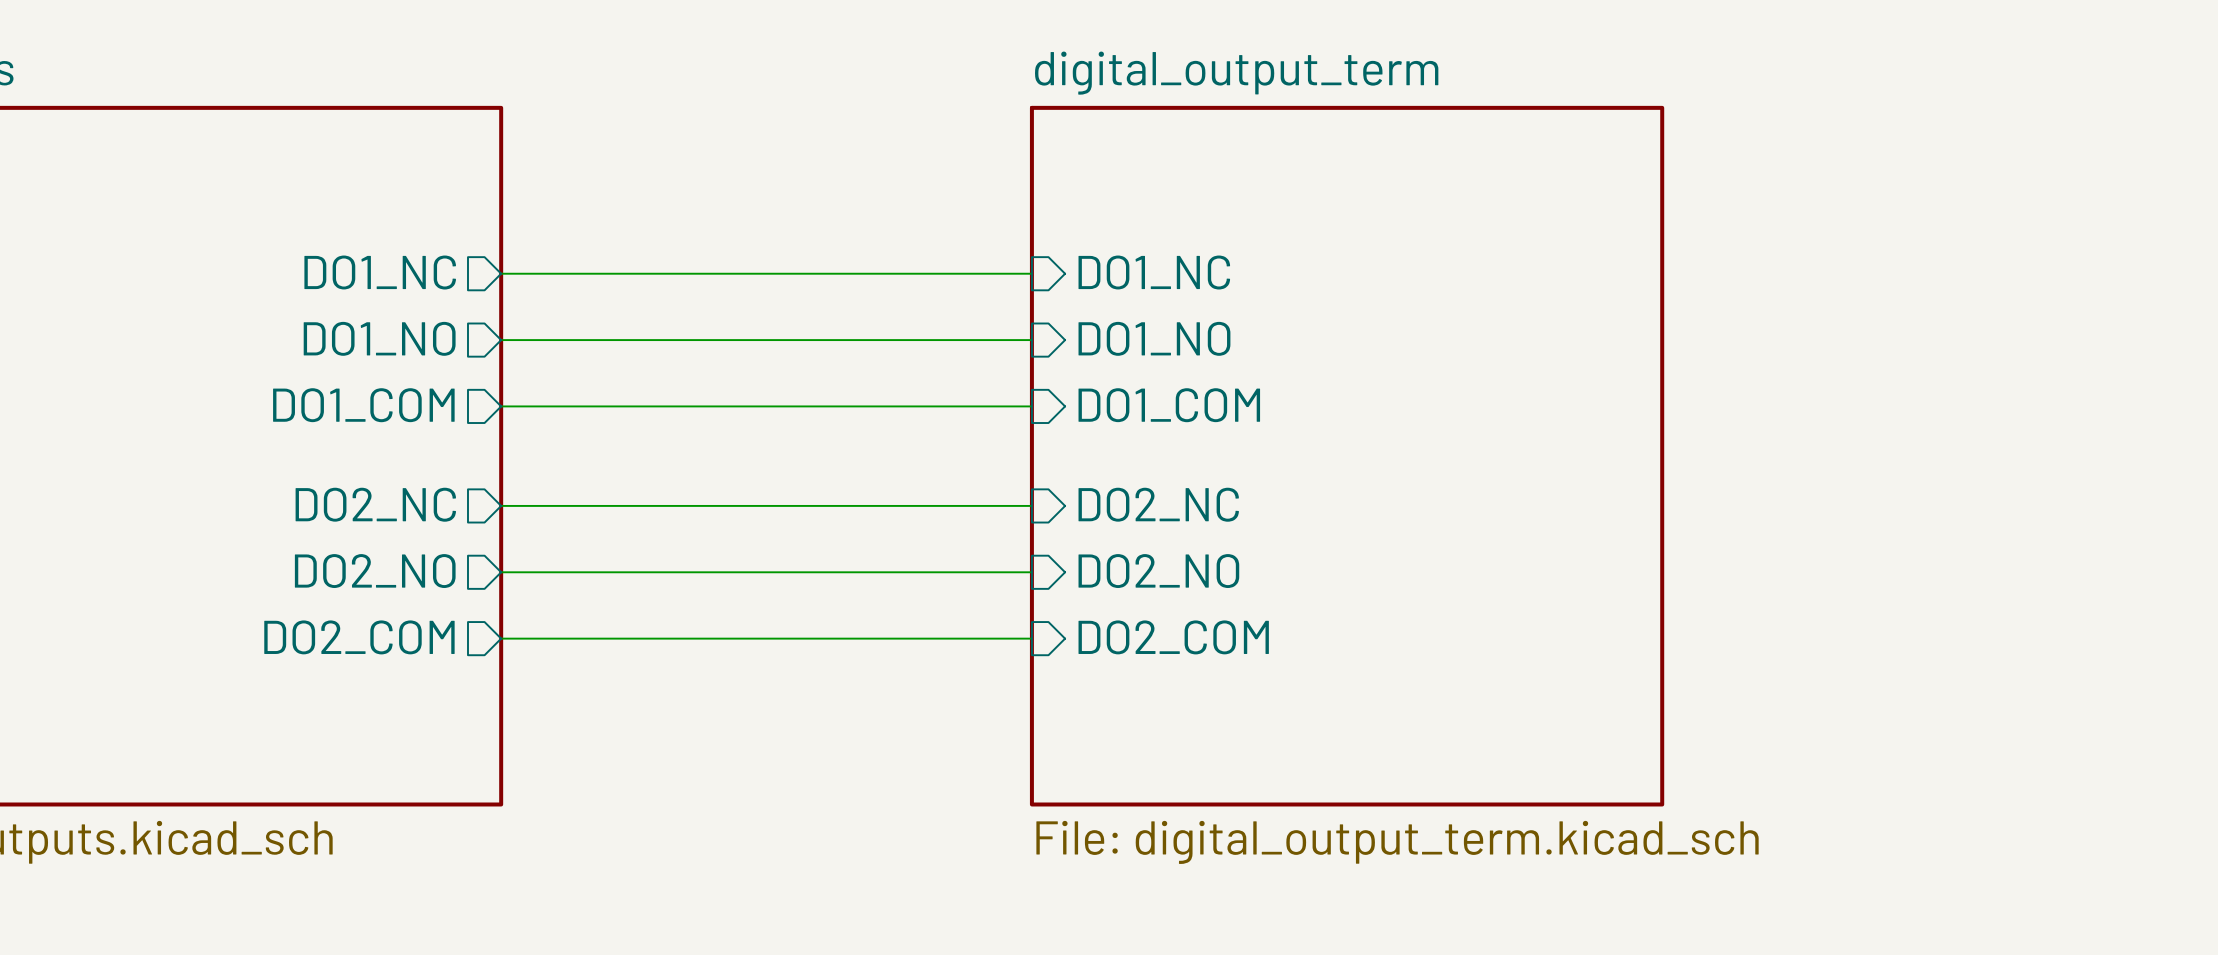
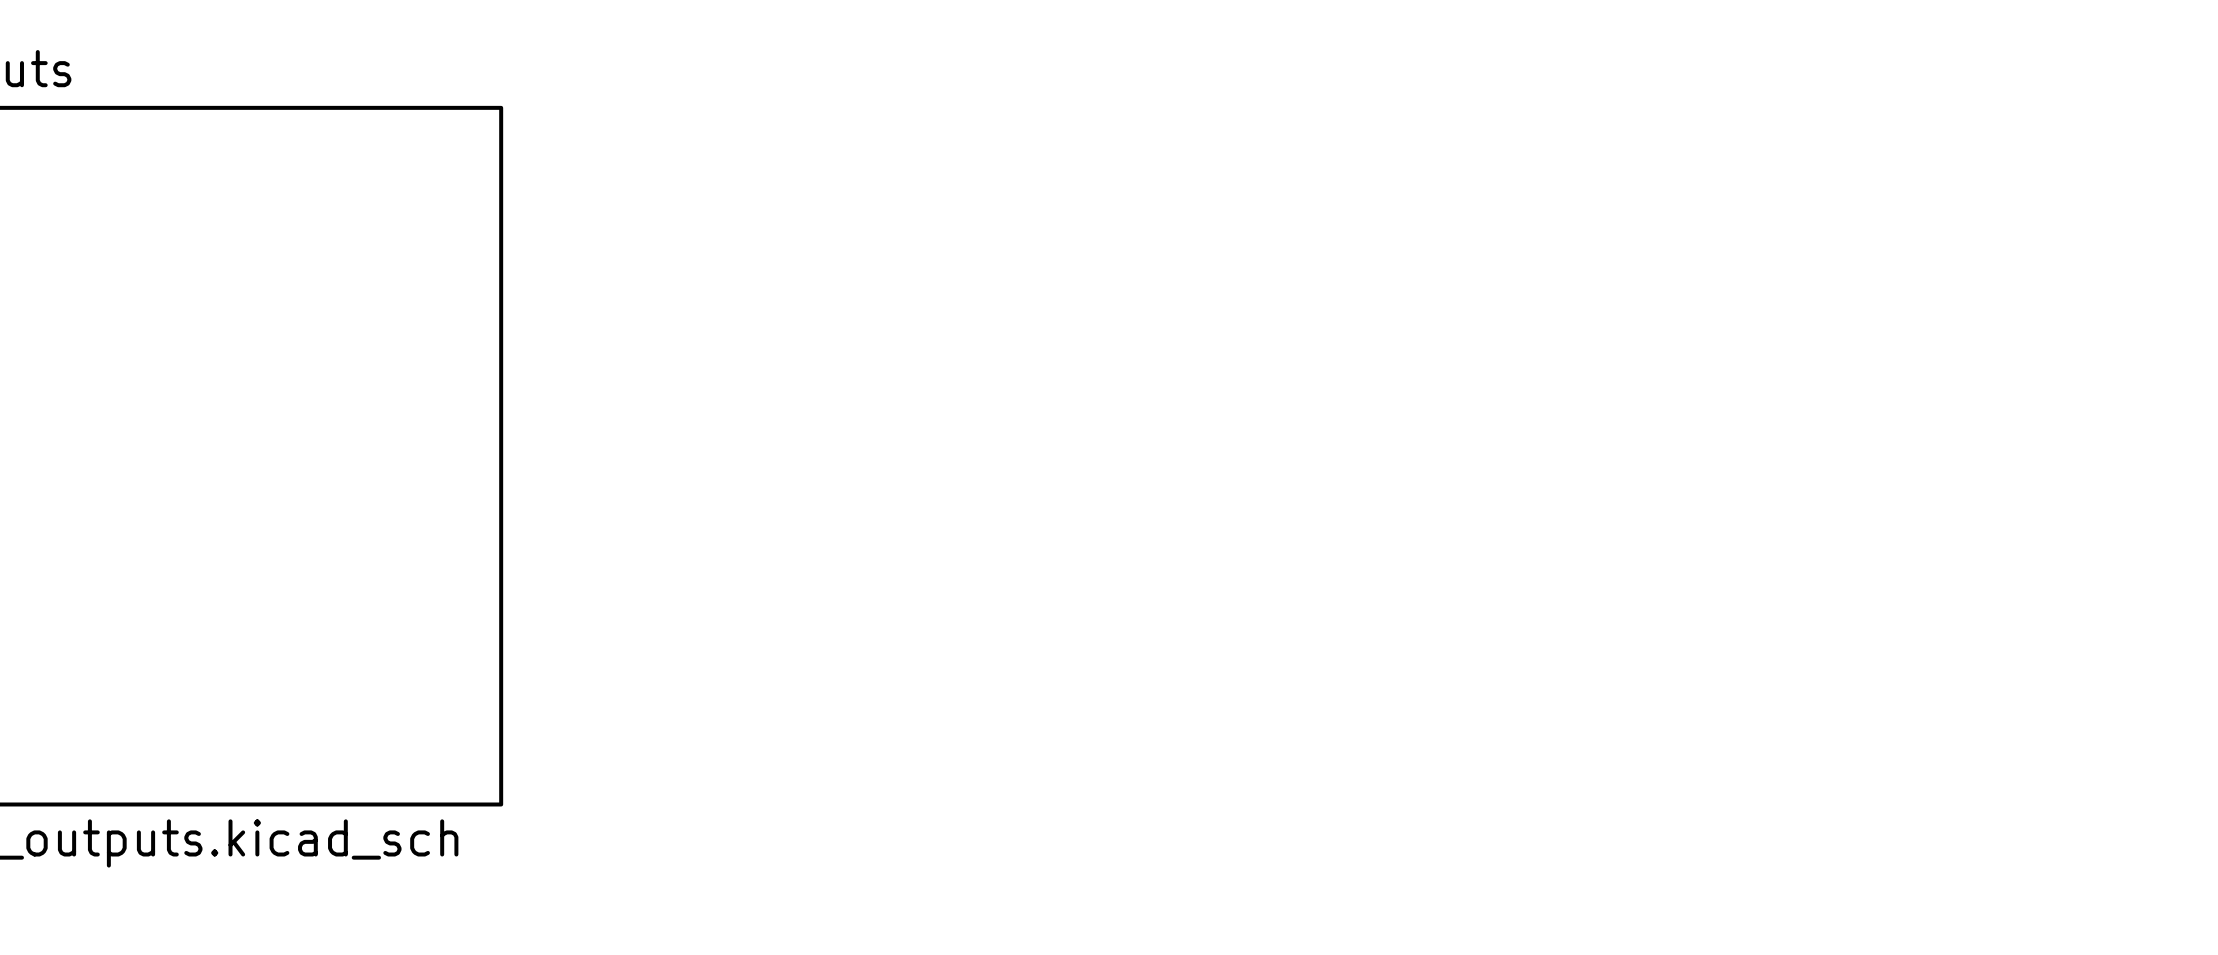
sheet pin: DO1_NC (380, 272) -> none
sheet pin: DO1_NC (1154, 272) -> none
wire: (501, 273) (1031, 273) -> none
sheet pin: DO1_NO (379, 338) -> none
sheet pin: DO1_NO (1154, 338) -> none
wire: (501, 340) (1031, 340) -> none
sheet pin: DO1_COM (363, 405) -> none
sheet pin: DO1_COM (1169, 405) -> none
wire: (501, 406) (1031, 406) -> none
sheet digital_output_term: File: digital_output_term.kicad_sch (1347, 456) -> none
sheet pin: DO2_NC (375, 504) -> none
sheet pin: DO2_NC (1158, 504) -> none
wire: (501, 505) (1031, 505) -> none
sheet pin: DO2_NO (375, 571) -> none
sheet pin: DO2_NO (1158, 571) -> none
wire: (501, 572) (1031, 572) -> none
sheet pin: DO2_COM (359, 637) -> none
sheet pin: DO2_COM (1173, 637) -> none
wire: (501, 638) (1031, 638) -> none

